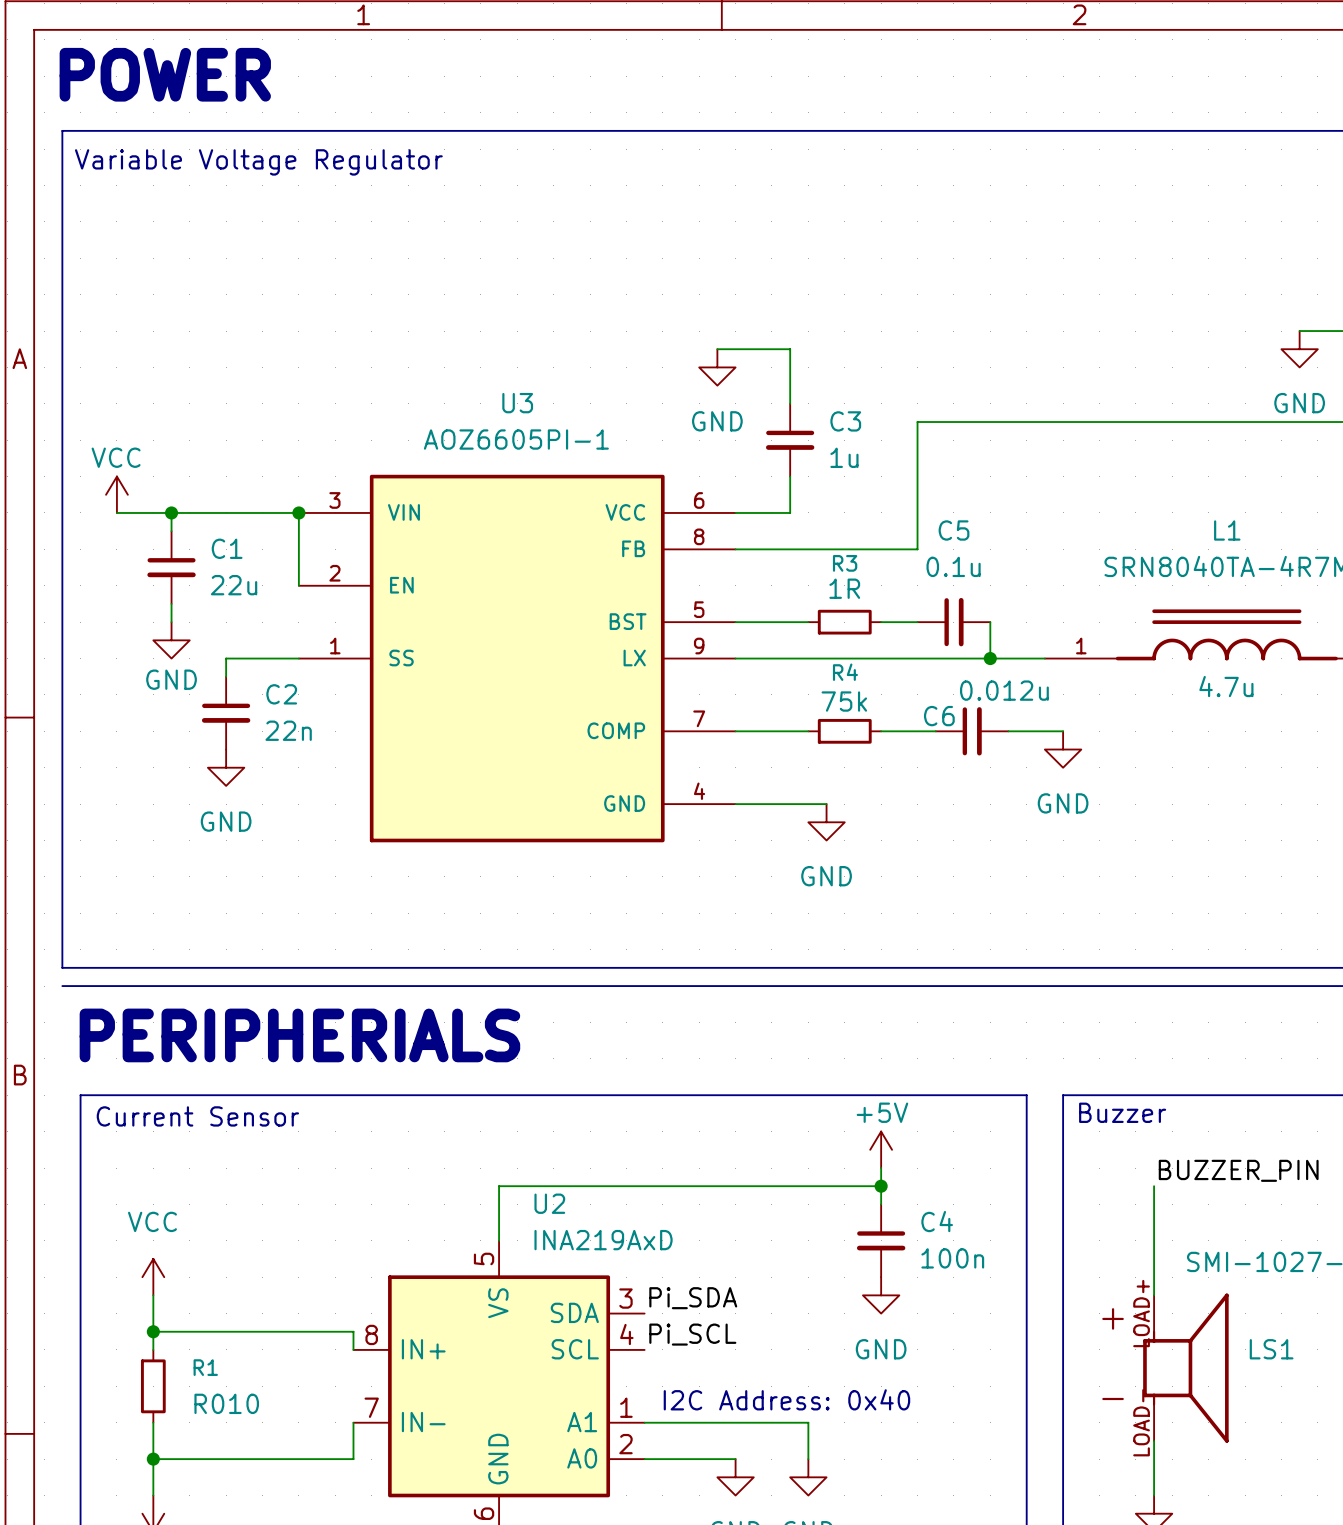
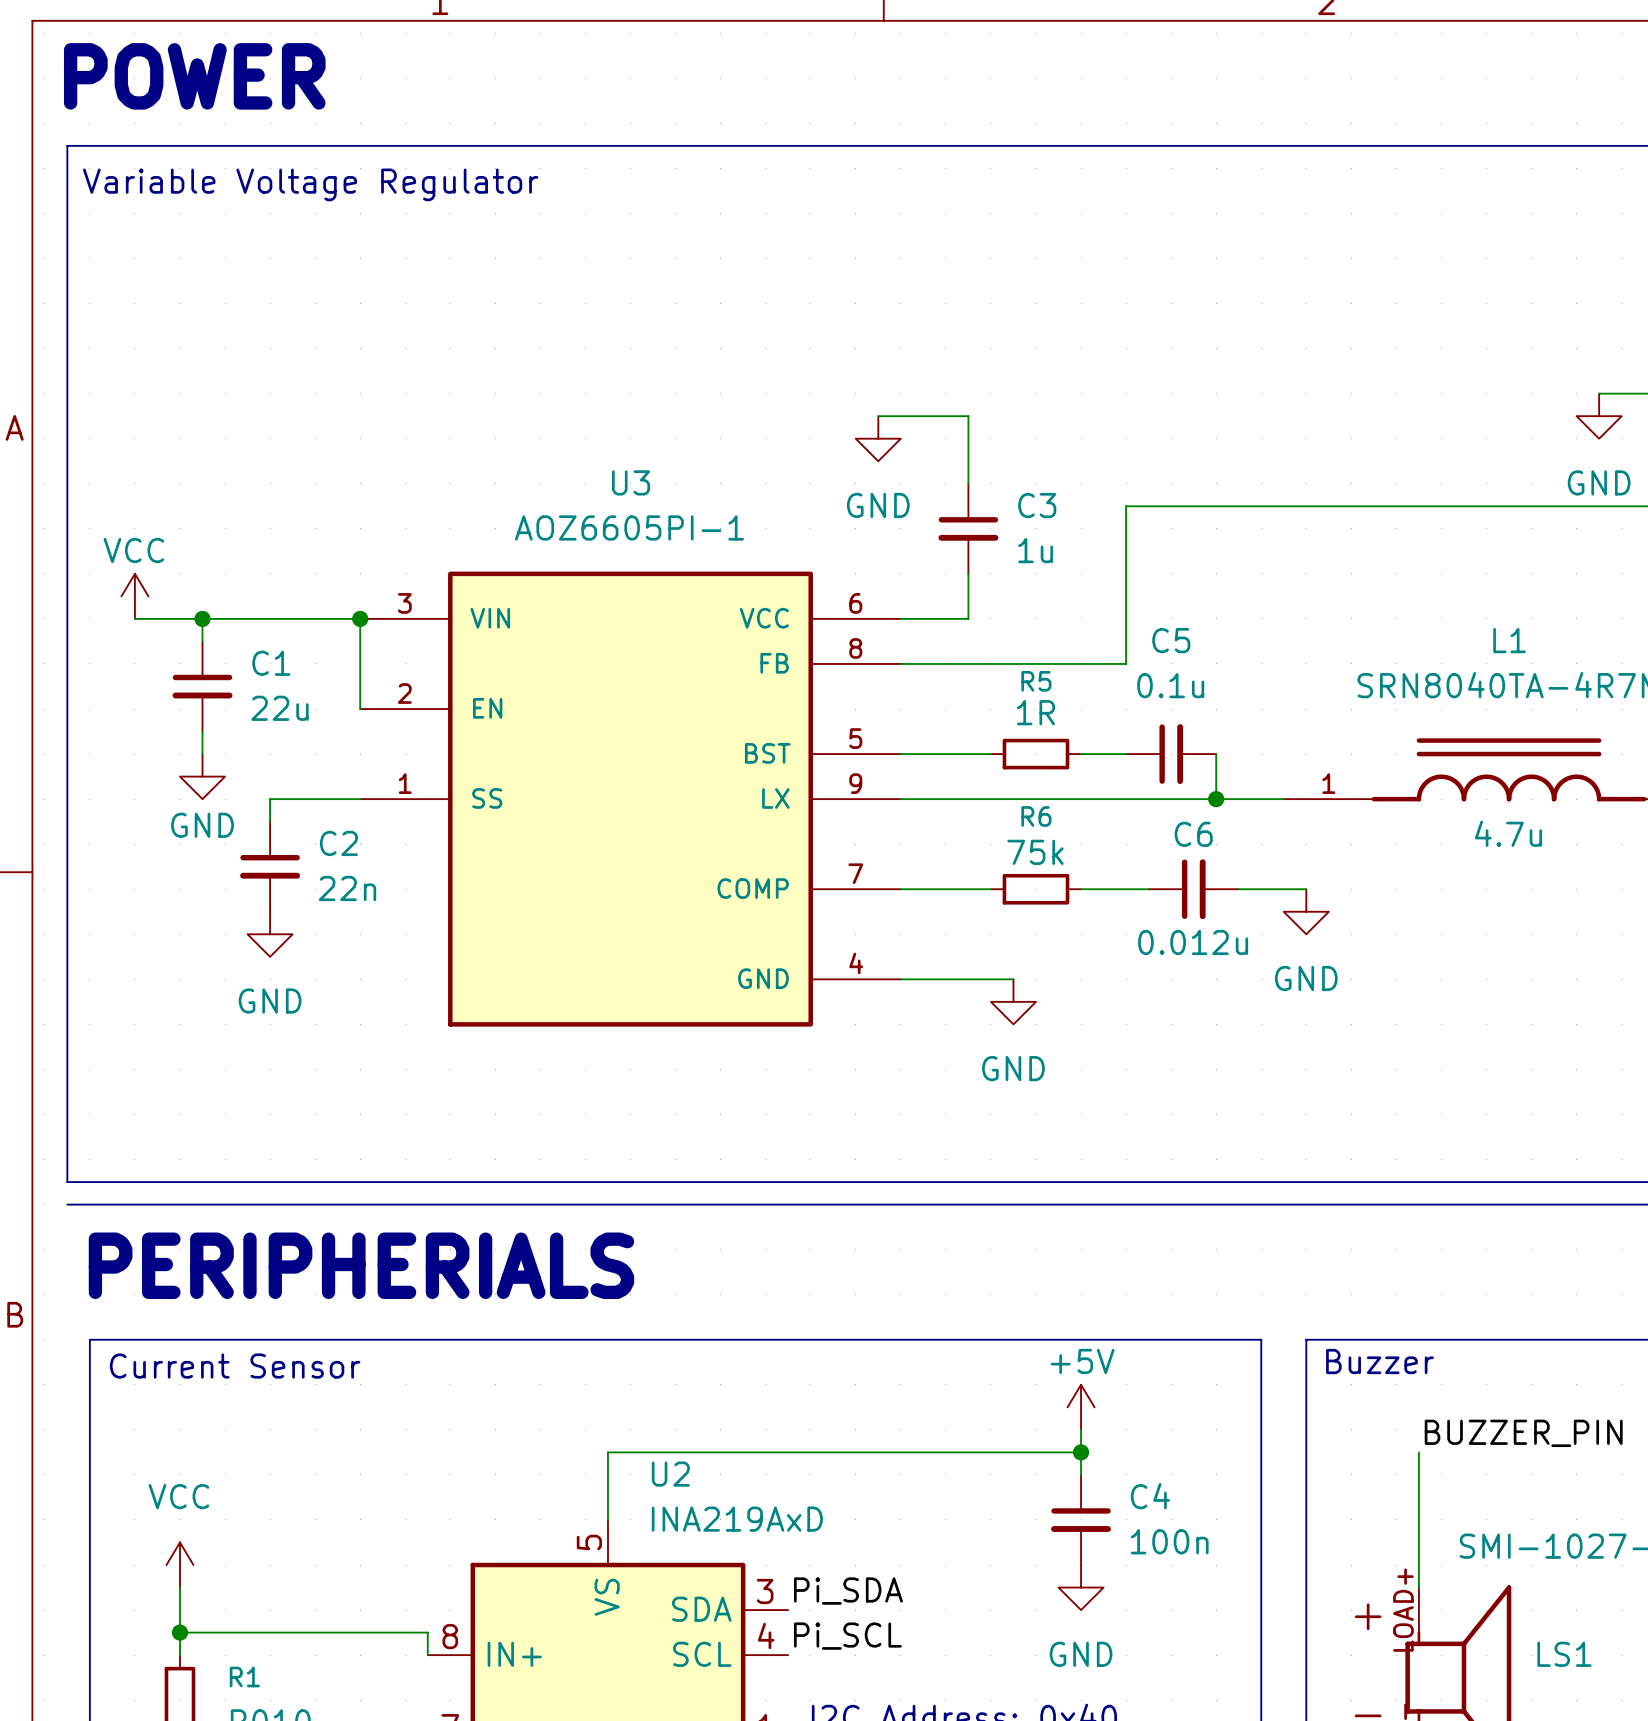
R3 name: R3 (845, 563) -> R5 (1036, 681)
R4 name: R4 (845, 672) -> R6 (1036, 816)
C6 value position: 0.012u (1004, 690) -> 0.012u (1193, 942)
C6 name position: C6 (939, 716) -> C6 (1193, 834)

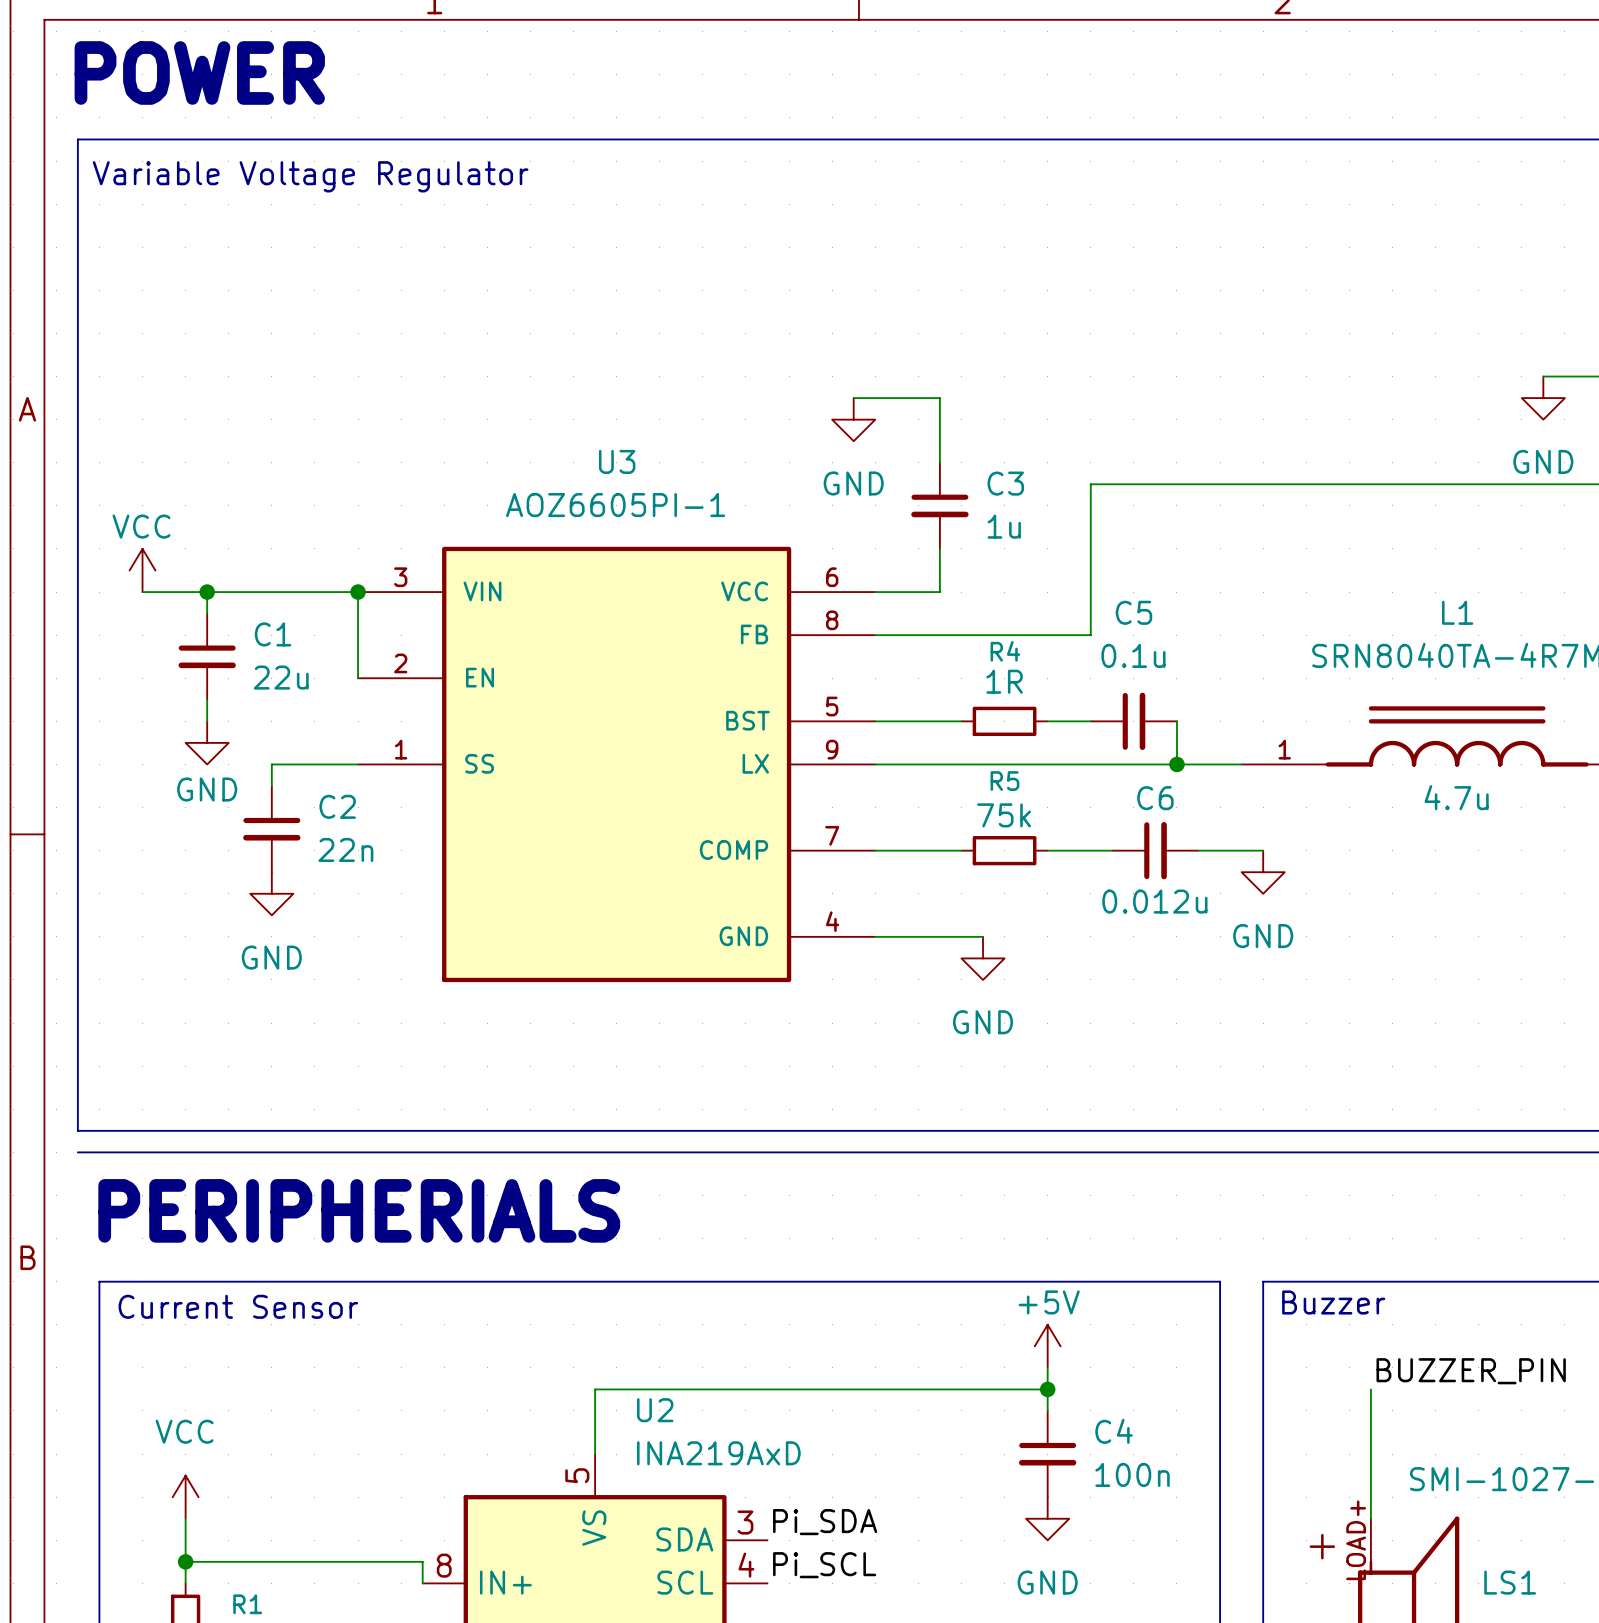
R5 name: R5 (1036, 681) -> R4 (1005, 651)
R6 name: R6 (1036, 816) -> R5 (1004, 781)

